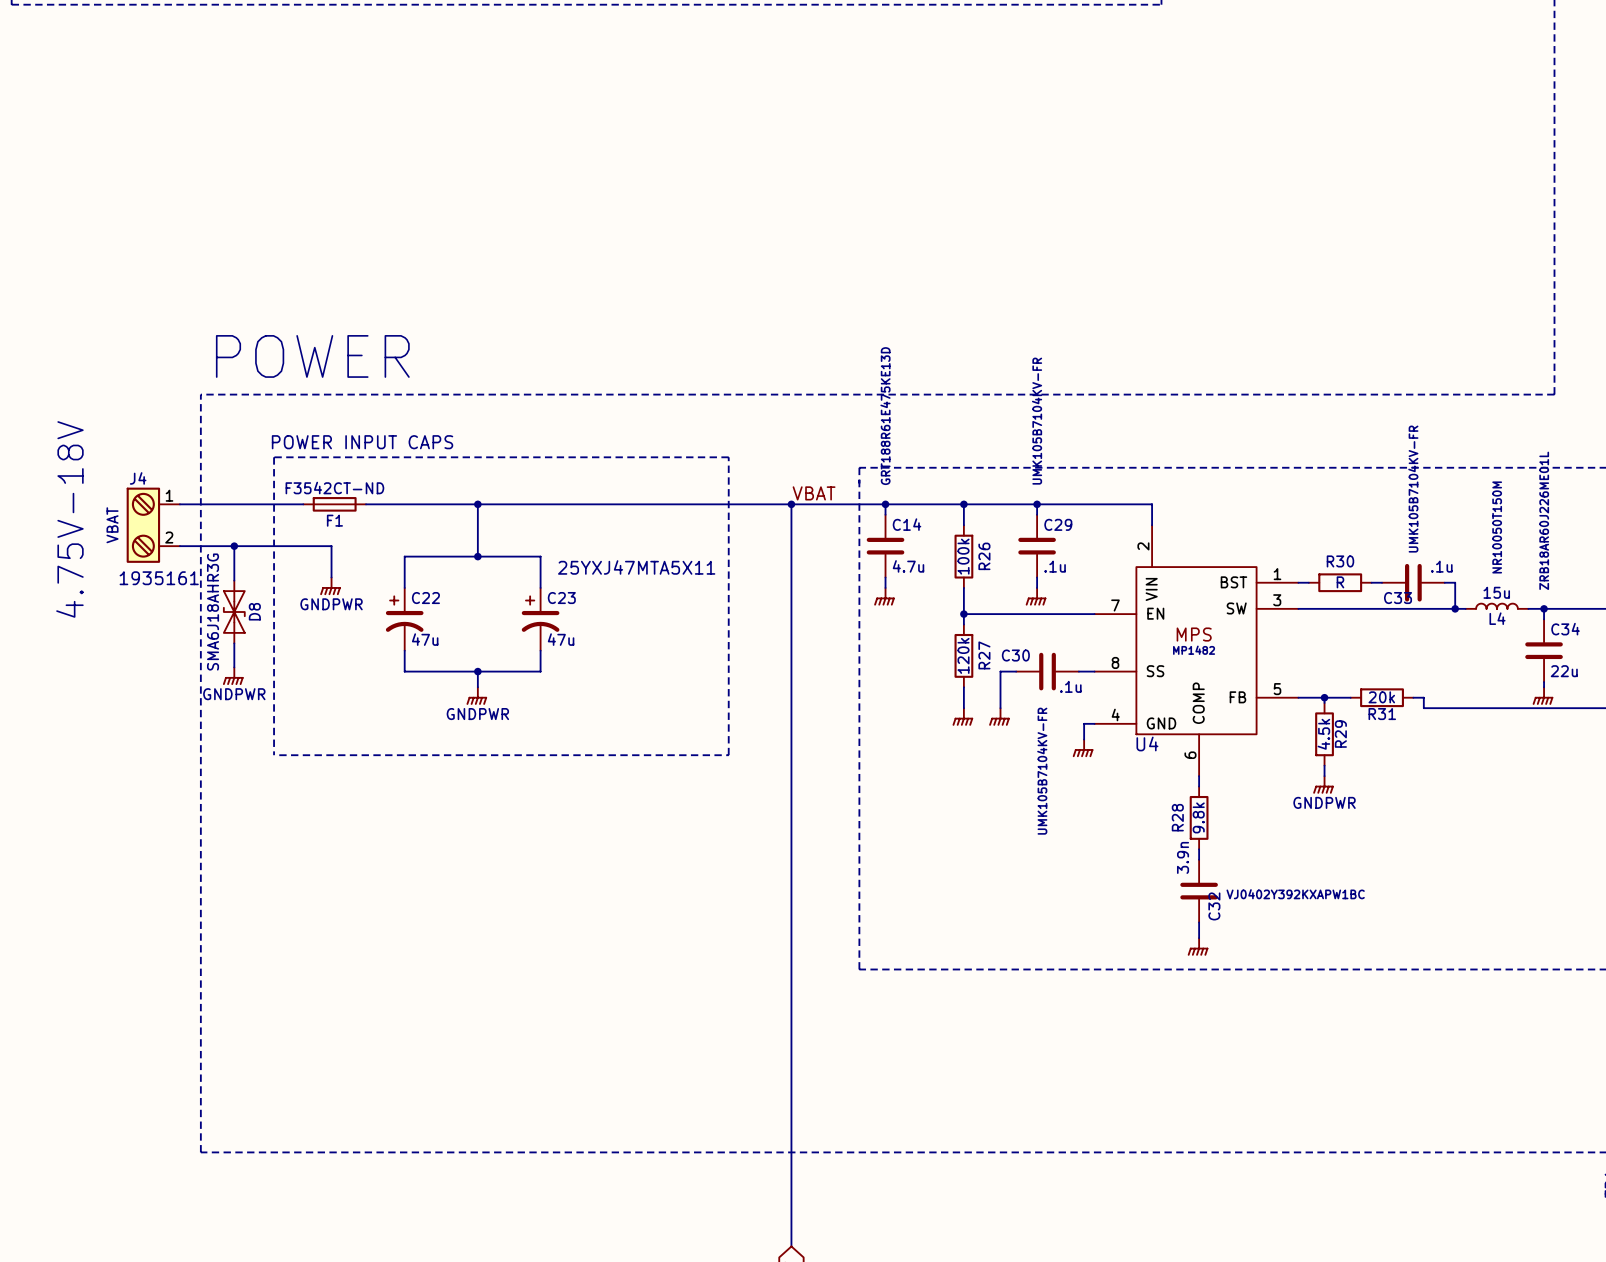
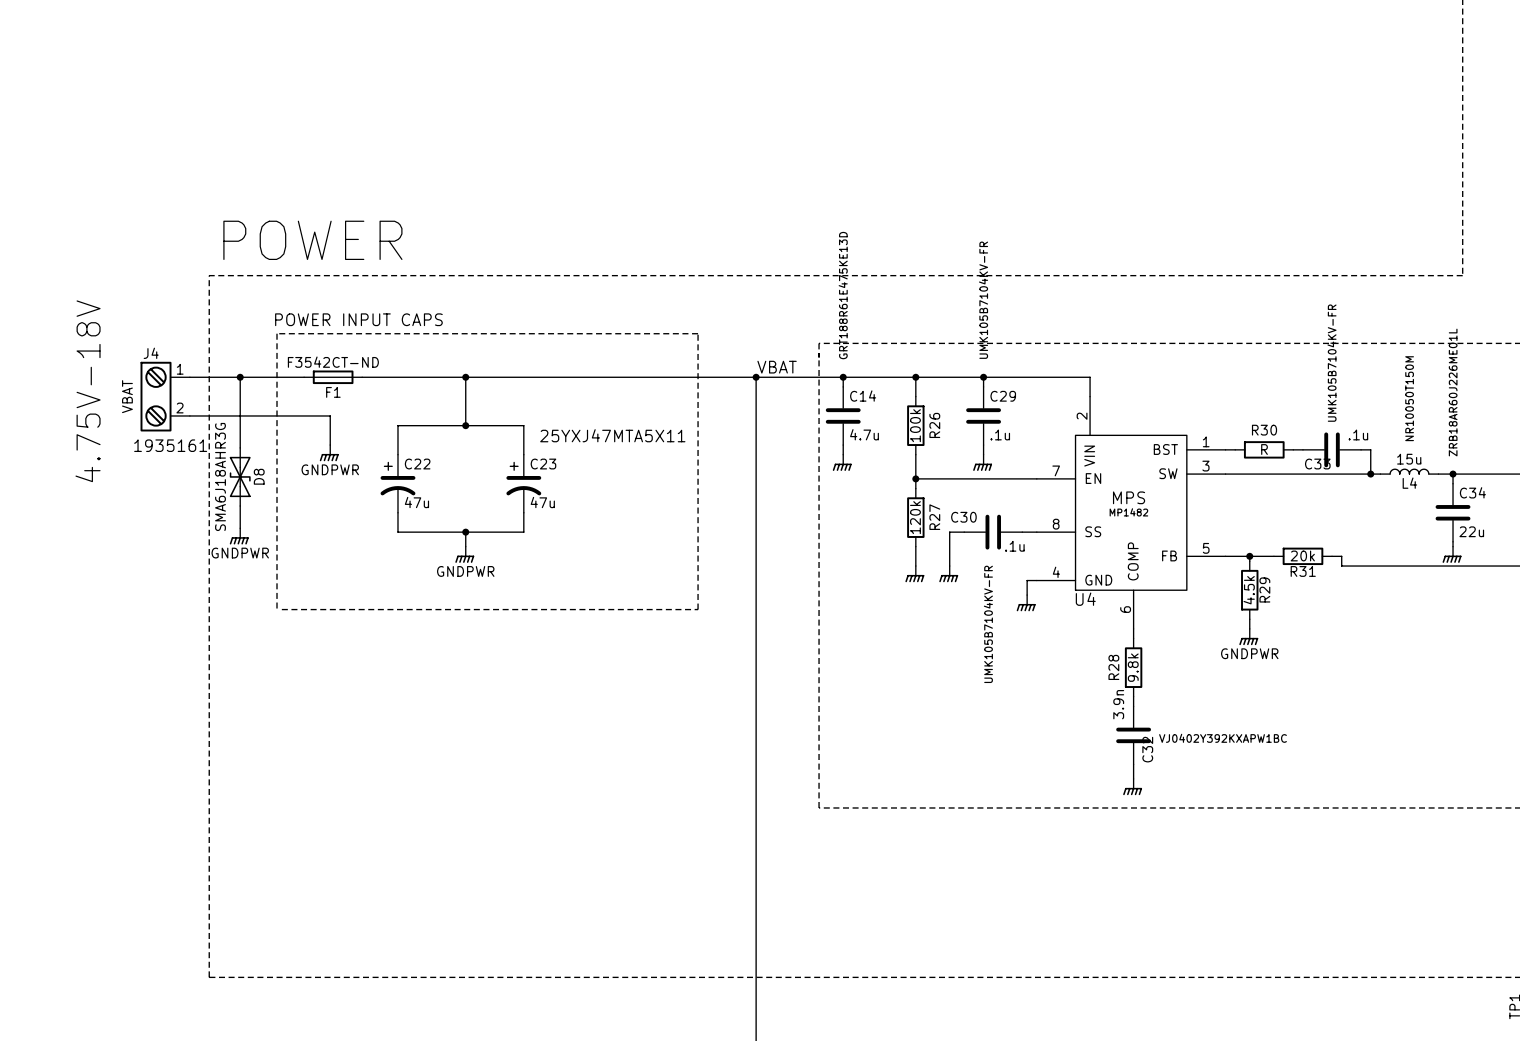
wire: none -> (240, 377) (240, 415)
junction position: (234, 546) -> (240, 377)

